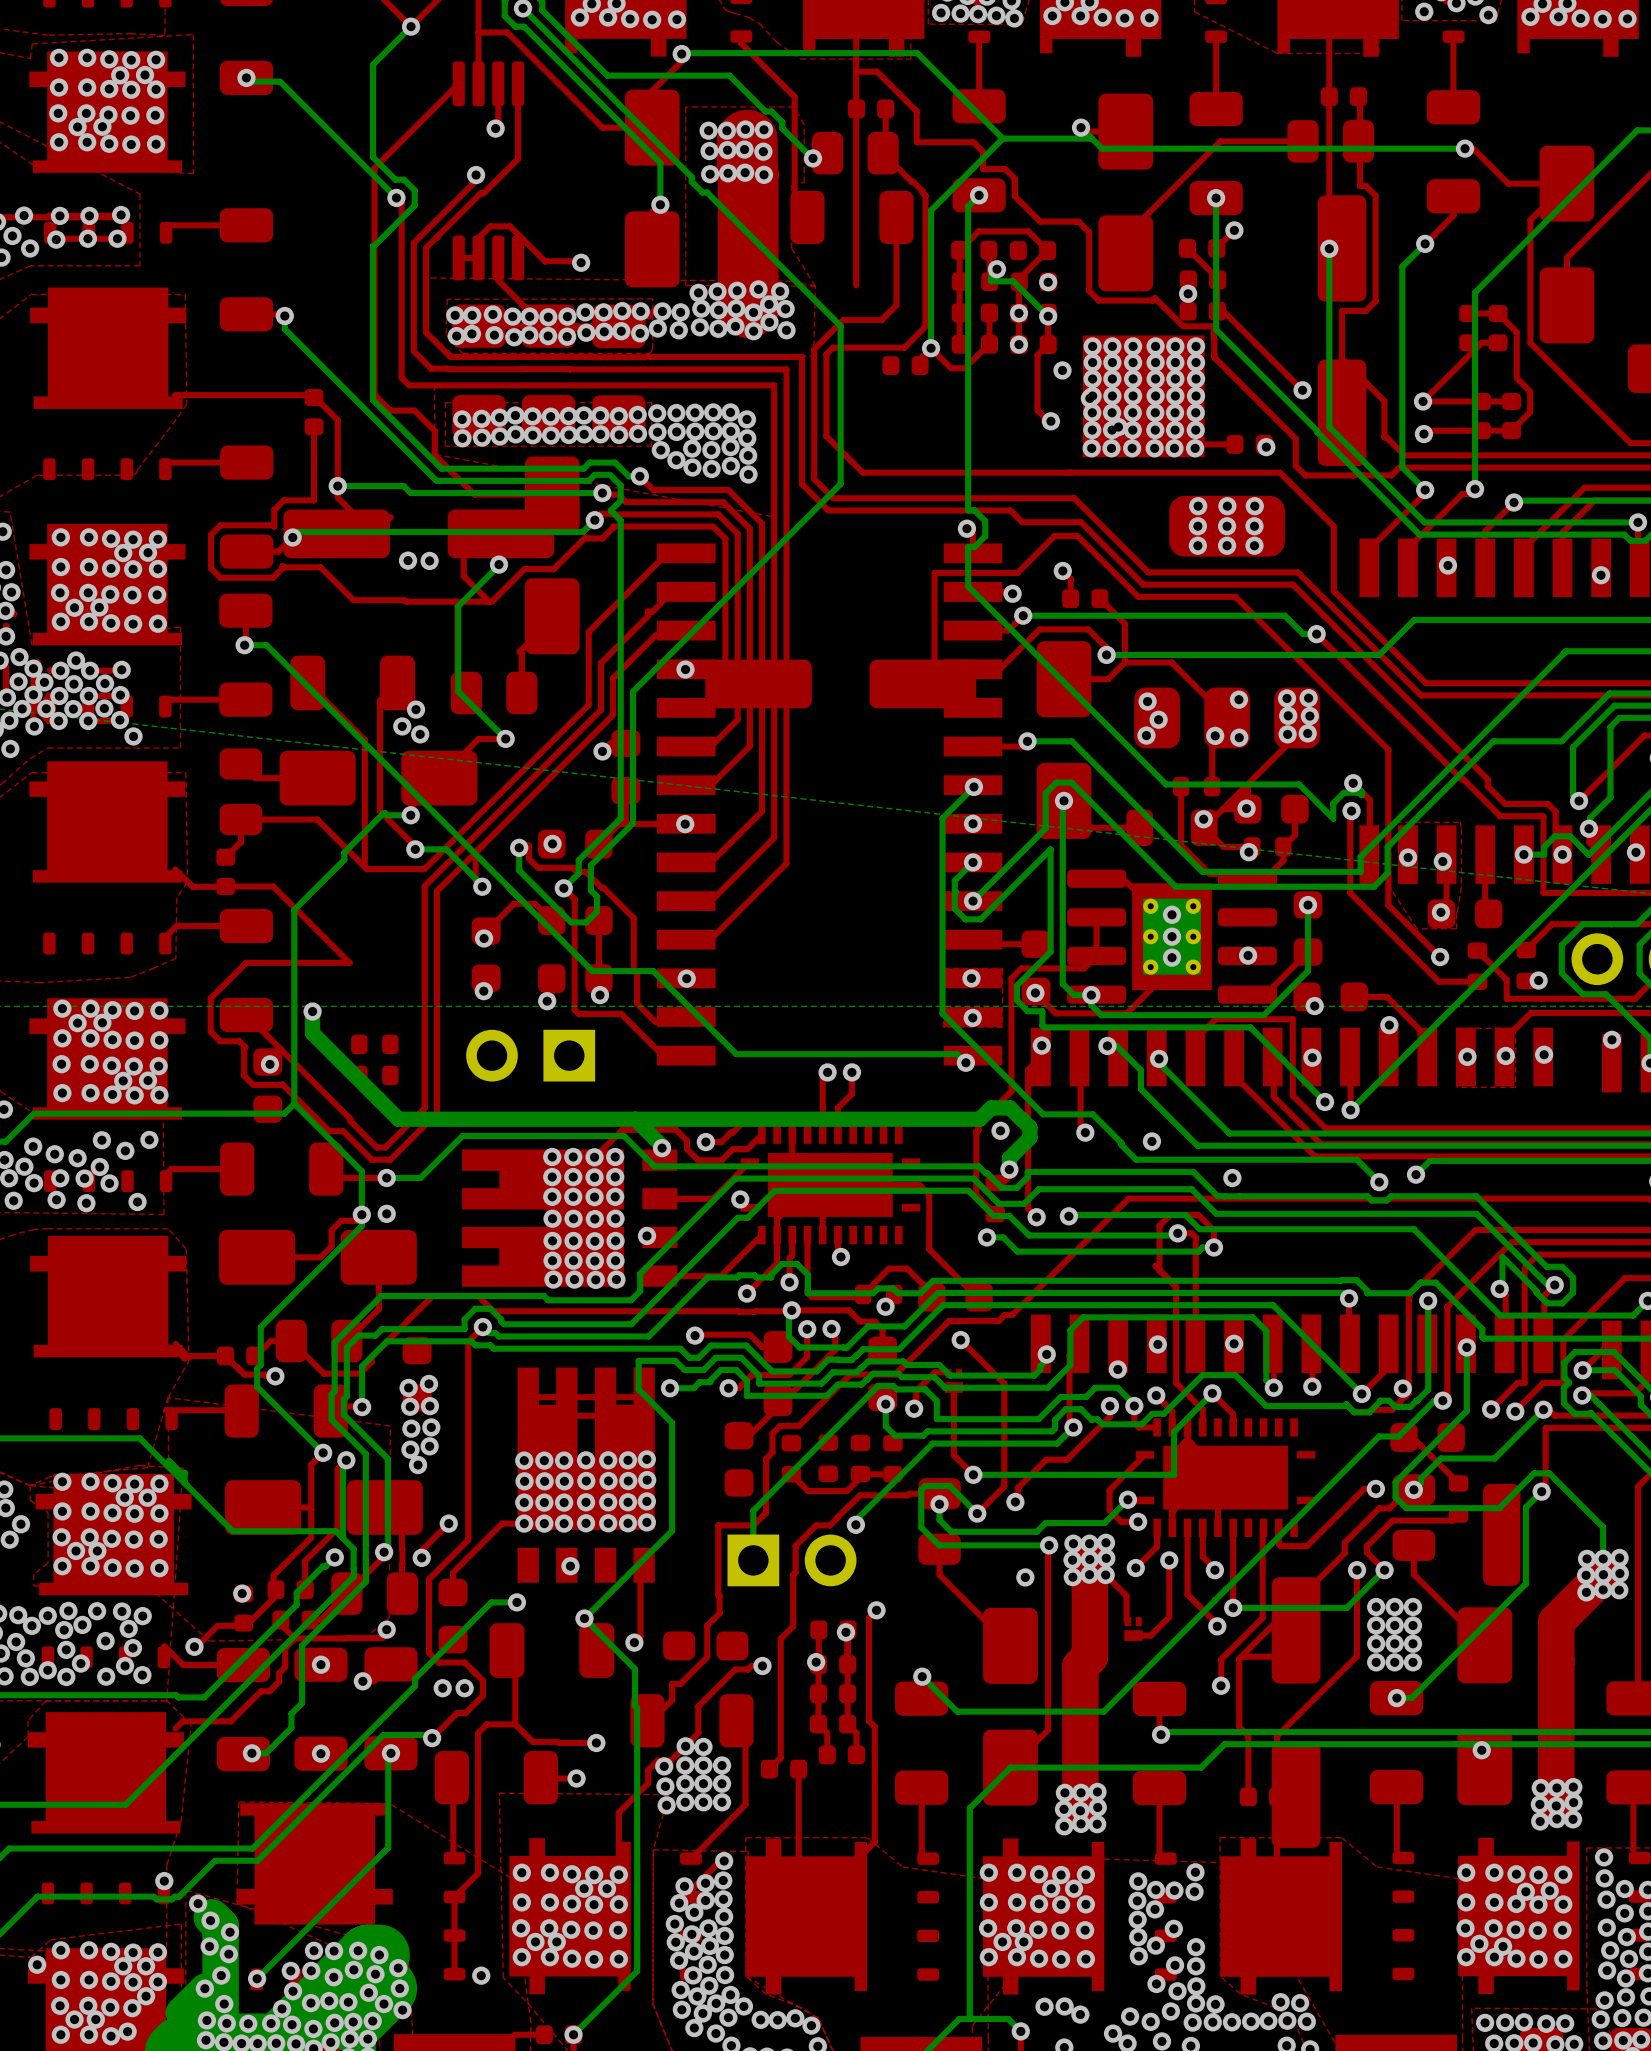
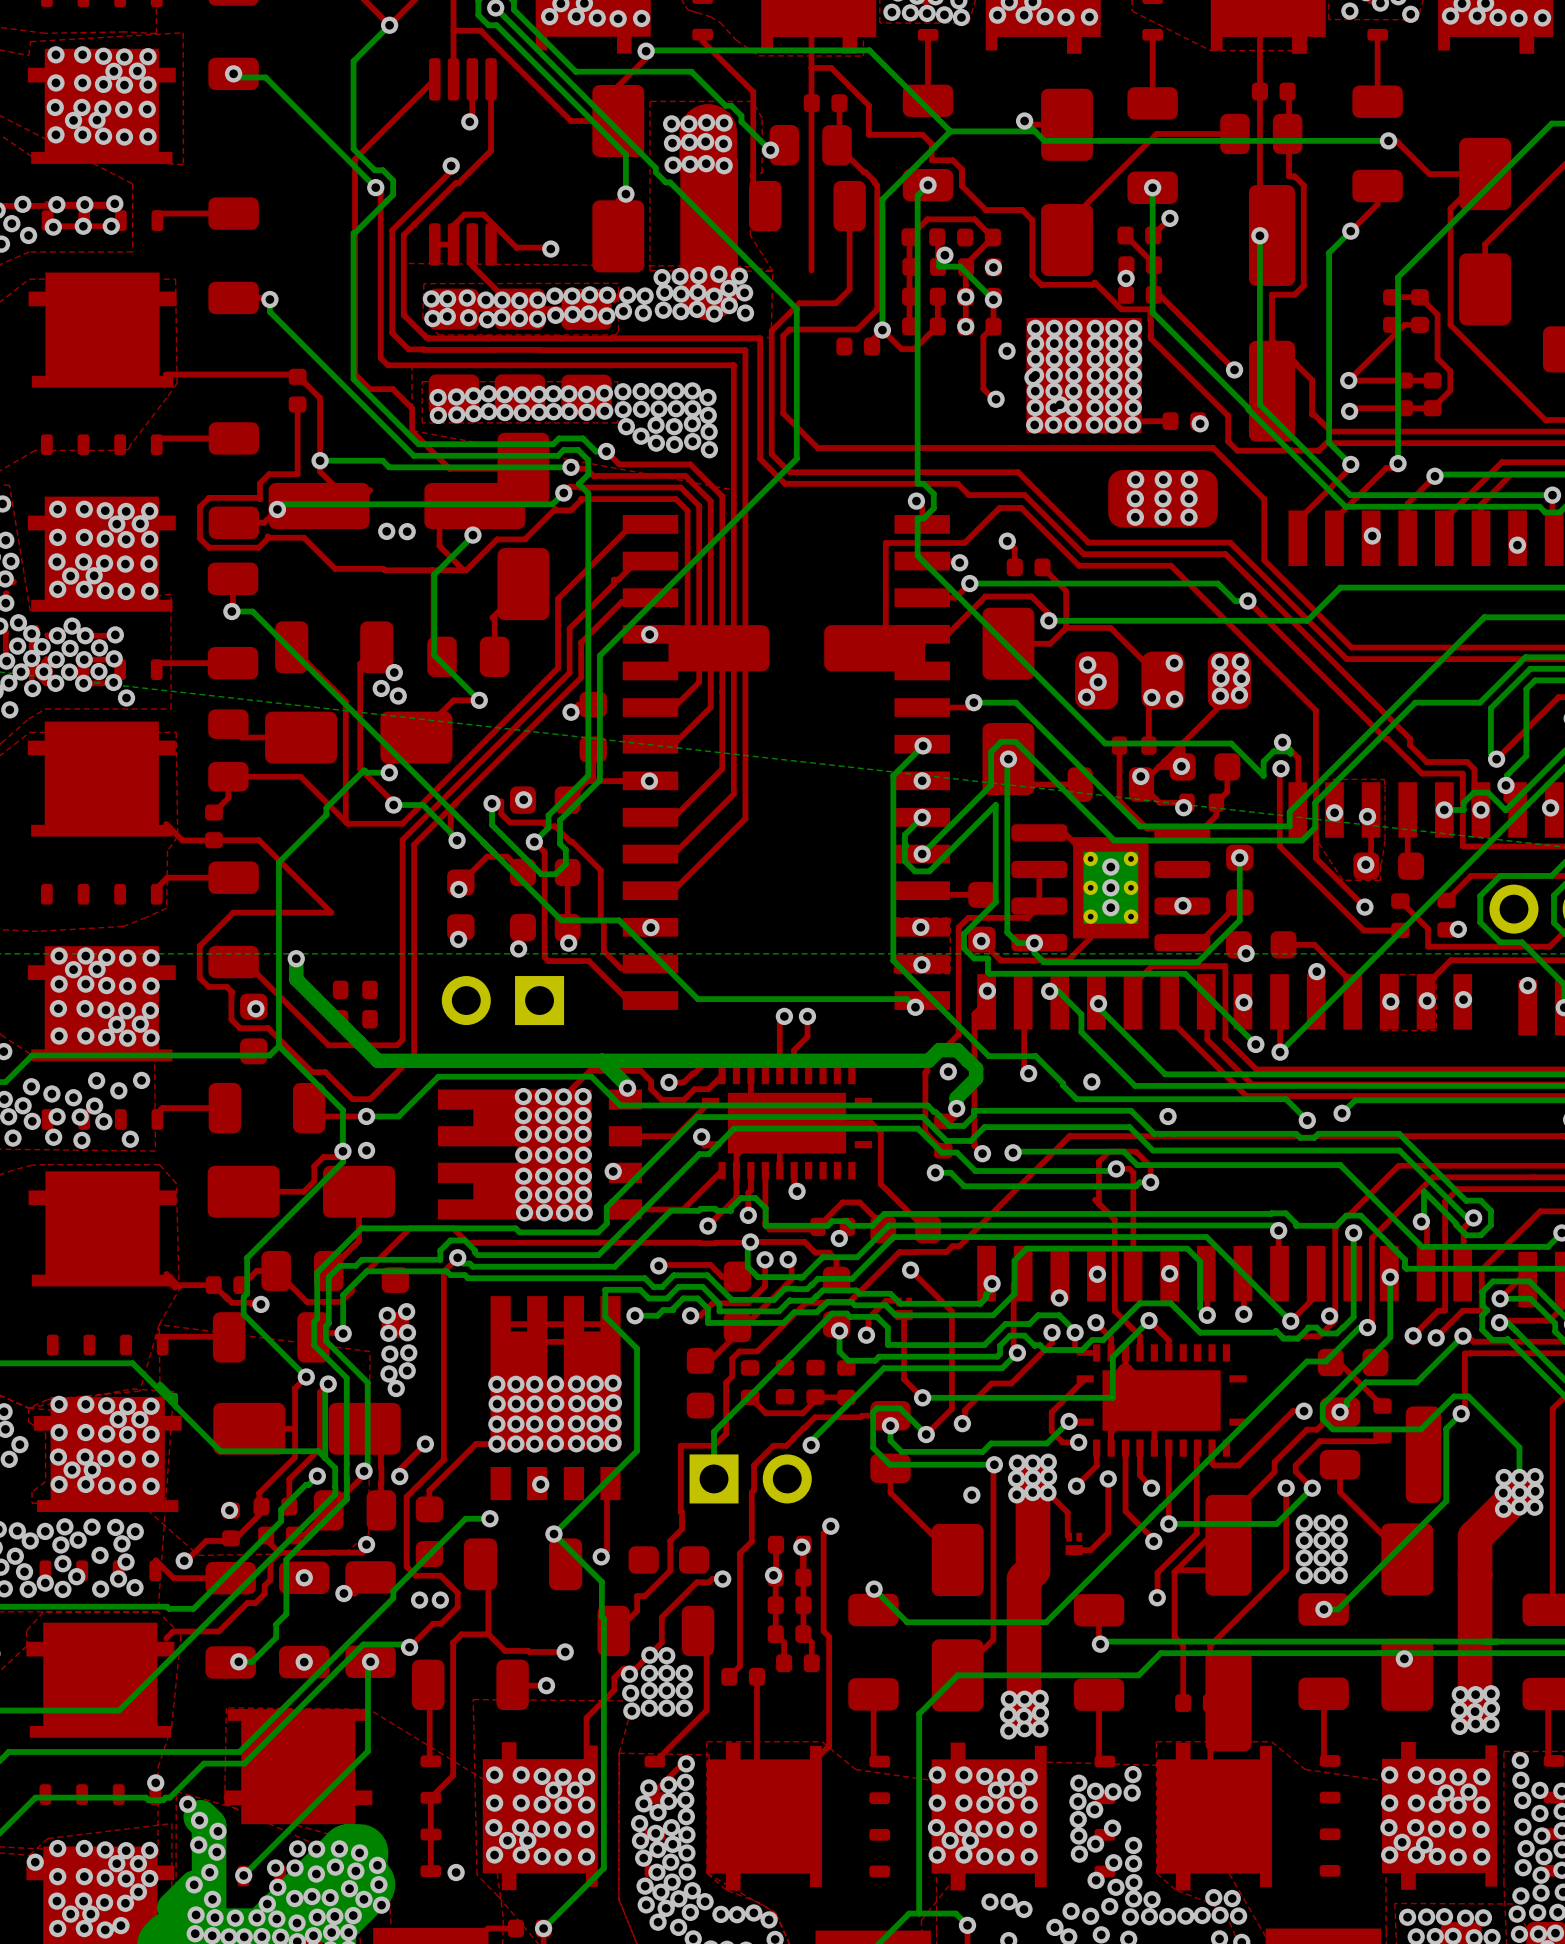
top track: (246, 1015) (376, 1147) (385, 1147) (424, 1108) (424, 1097) -> (233, 962) (245, 962) (328, 1045) (397, 1045) (402, 1039)

